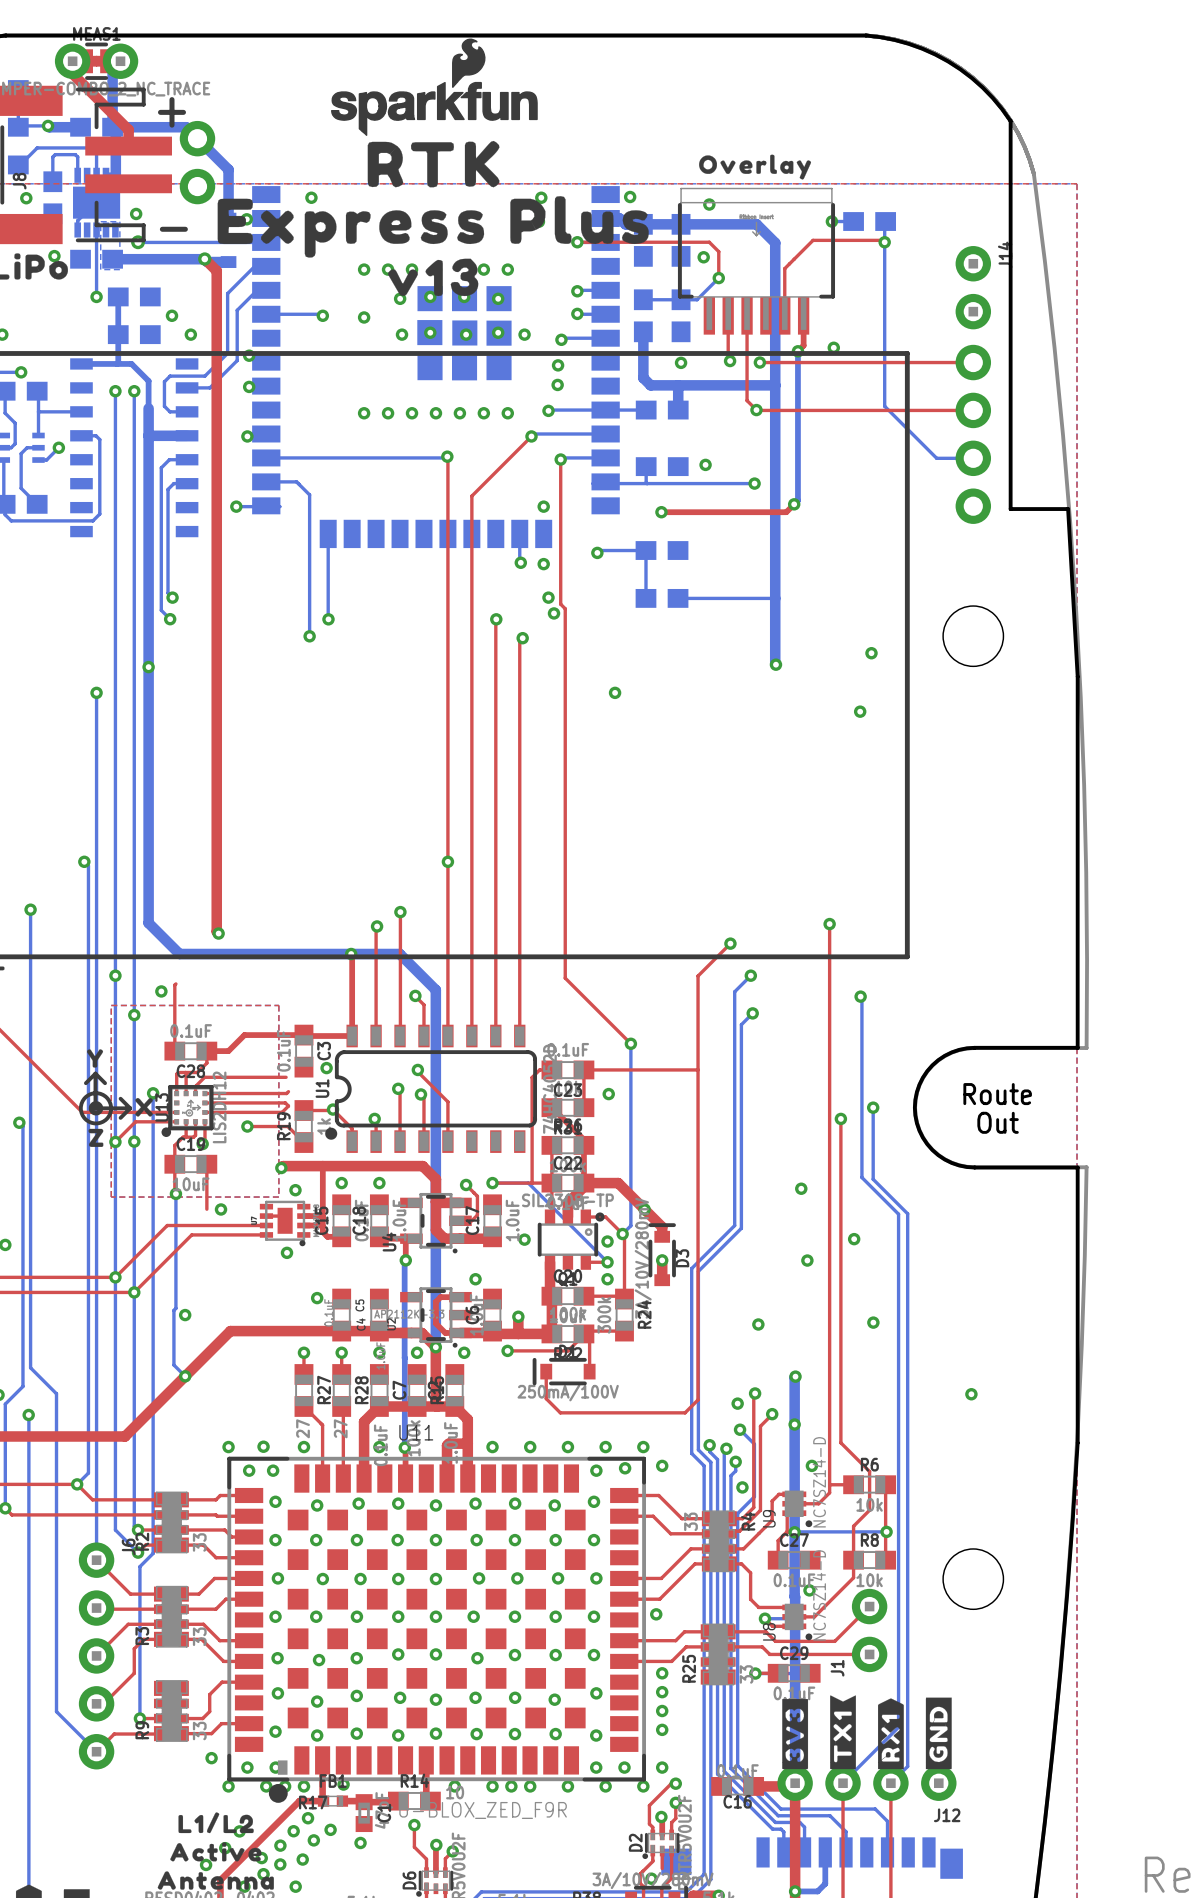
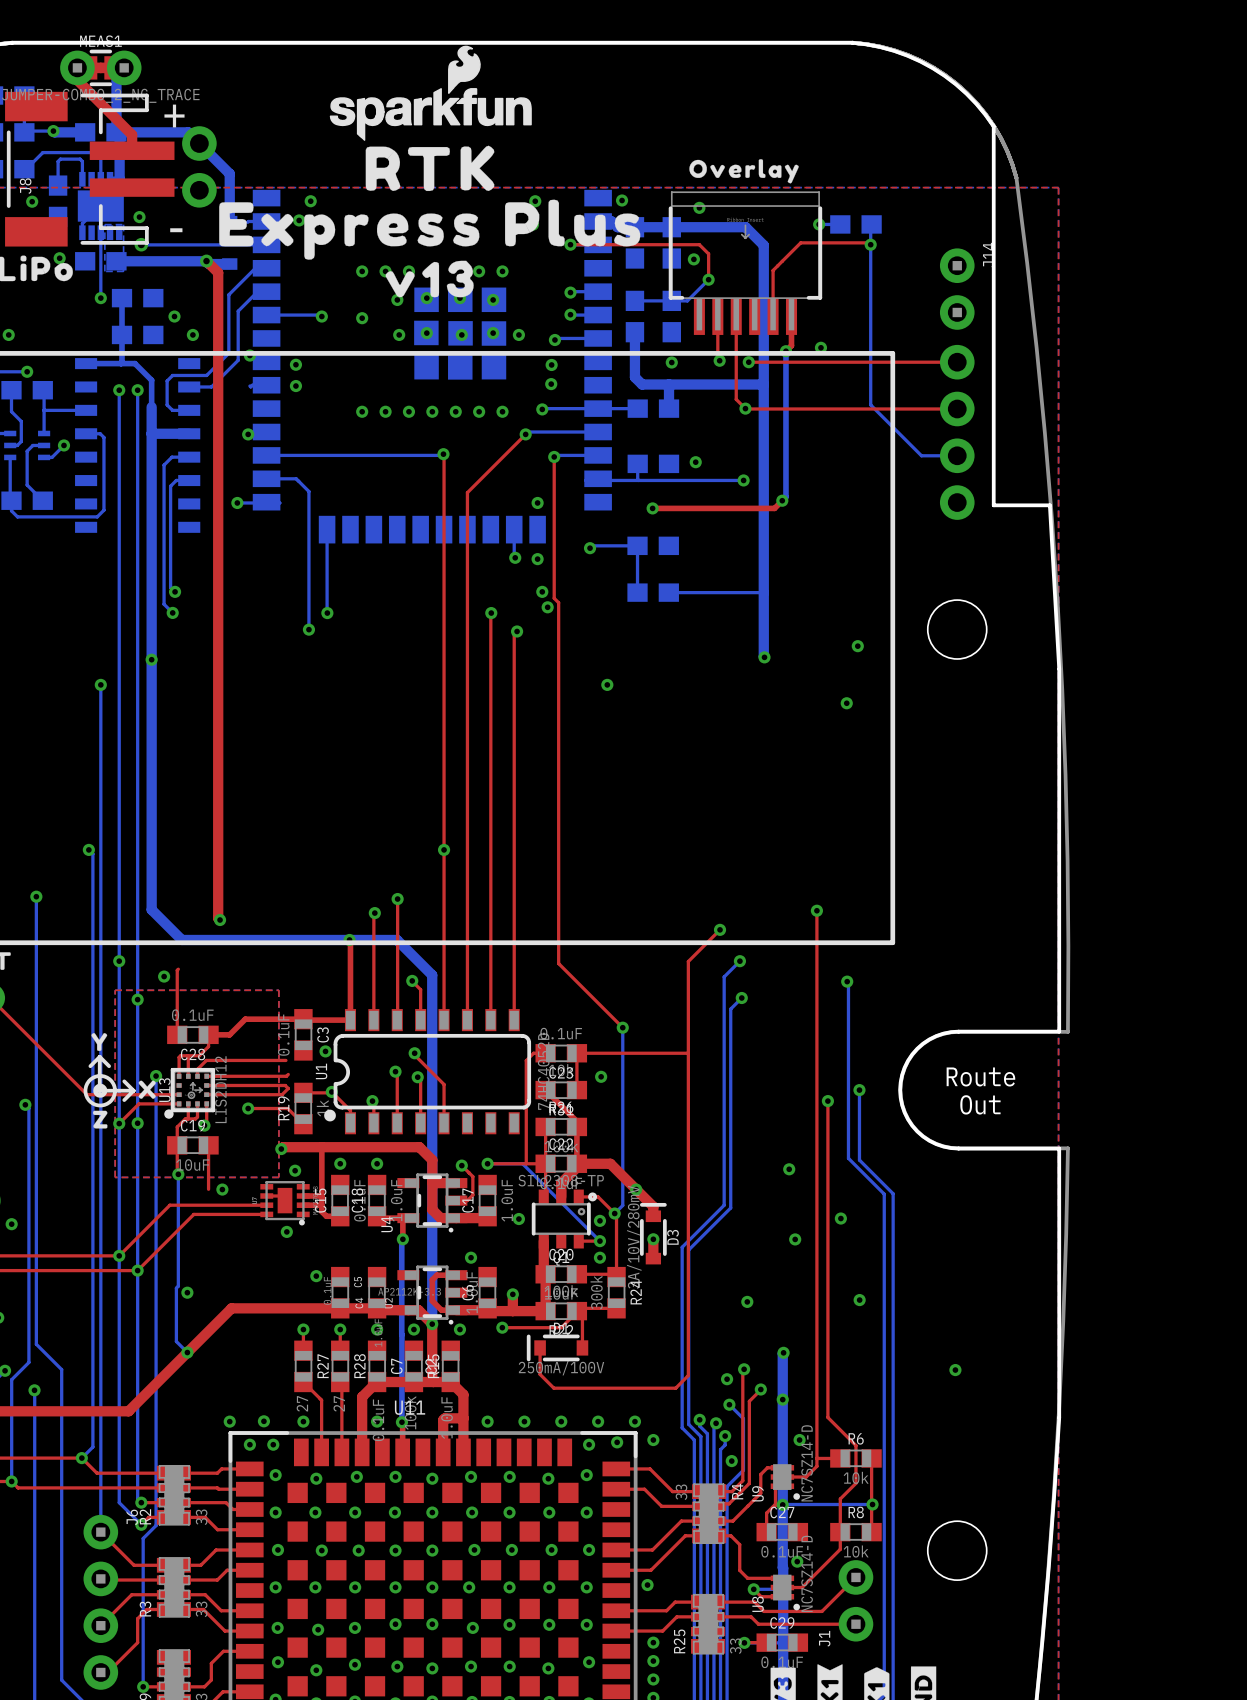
via position: (246, 219) -> (299, 220)
via: none -> (295, 364)
via: (249, 386) -> none
via: none -> (295, 386)

